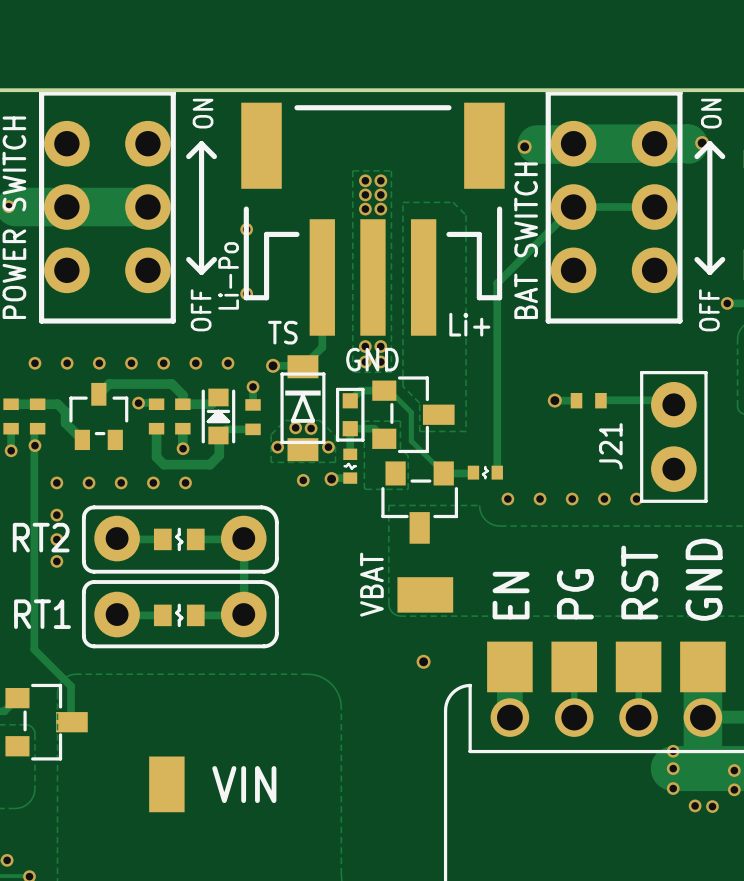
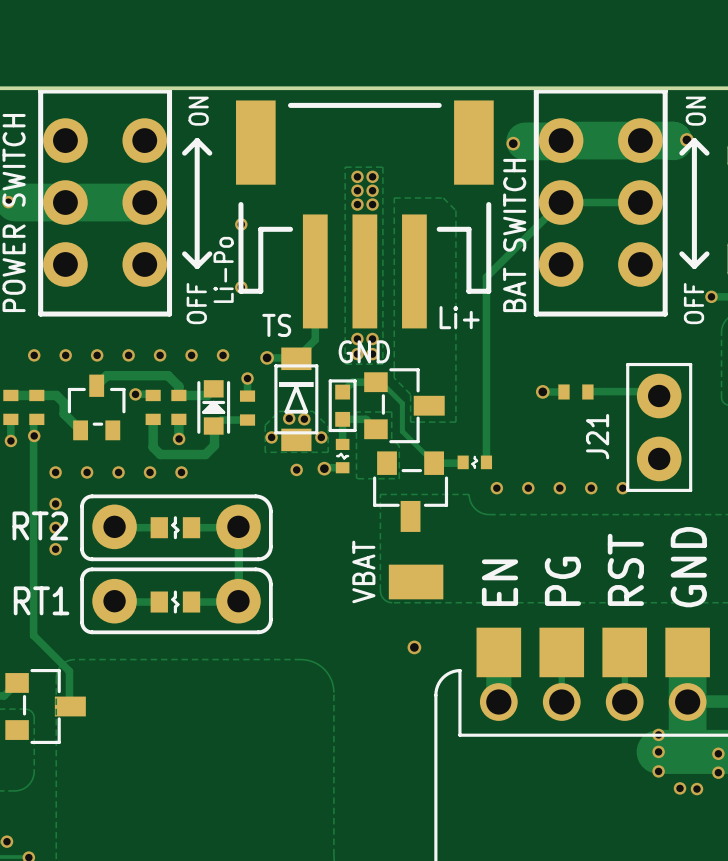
part: (166, 784) -> none
text: VIN (244, 784) -> none

